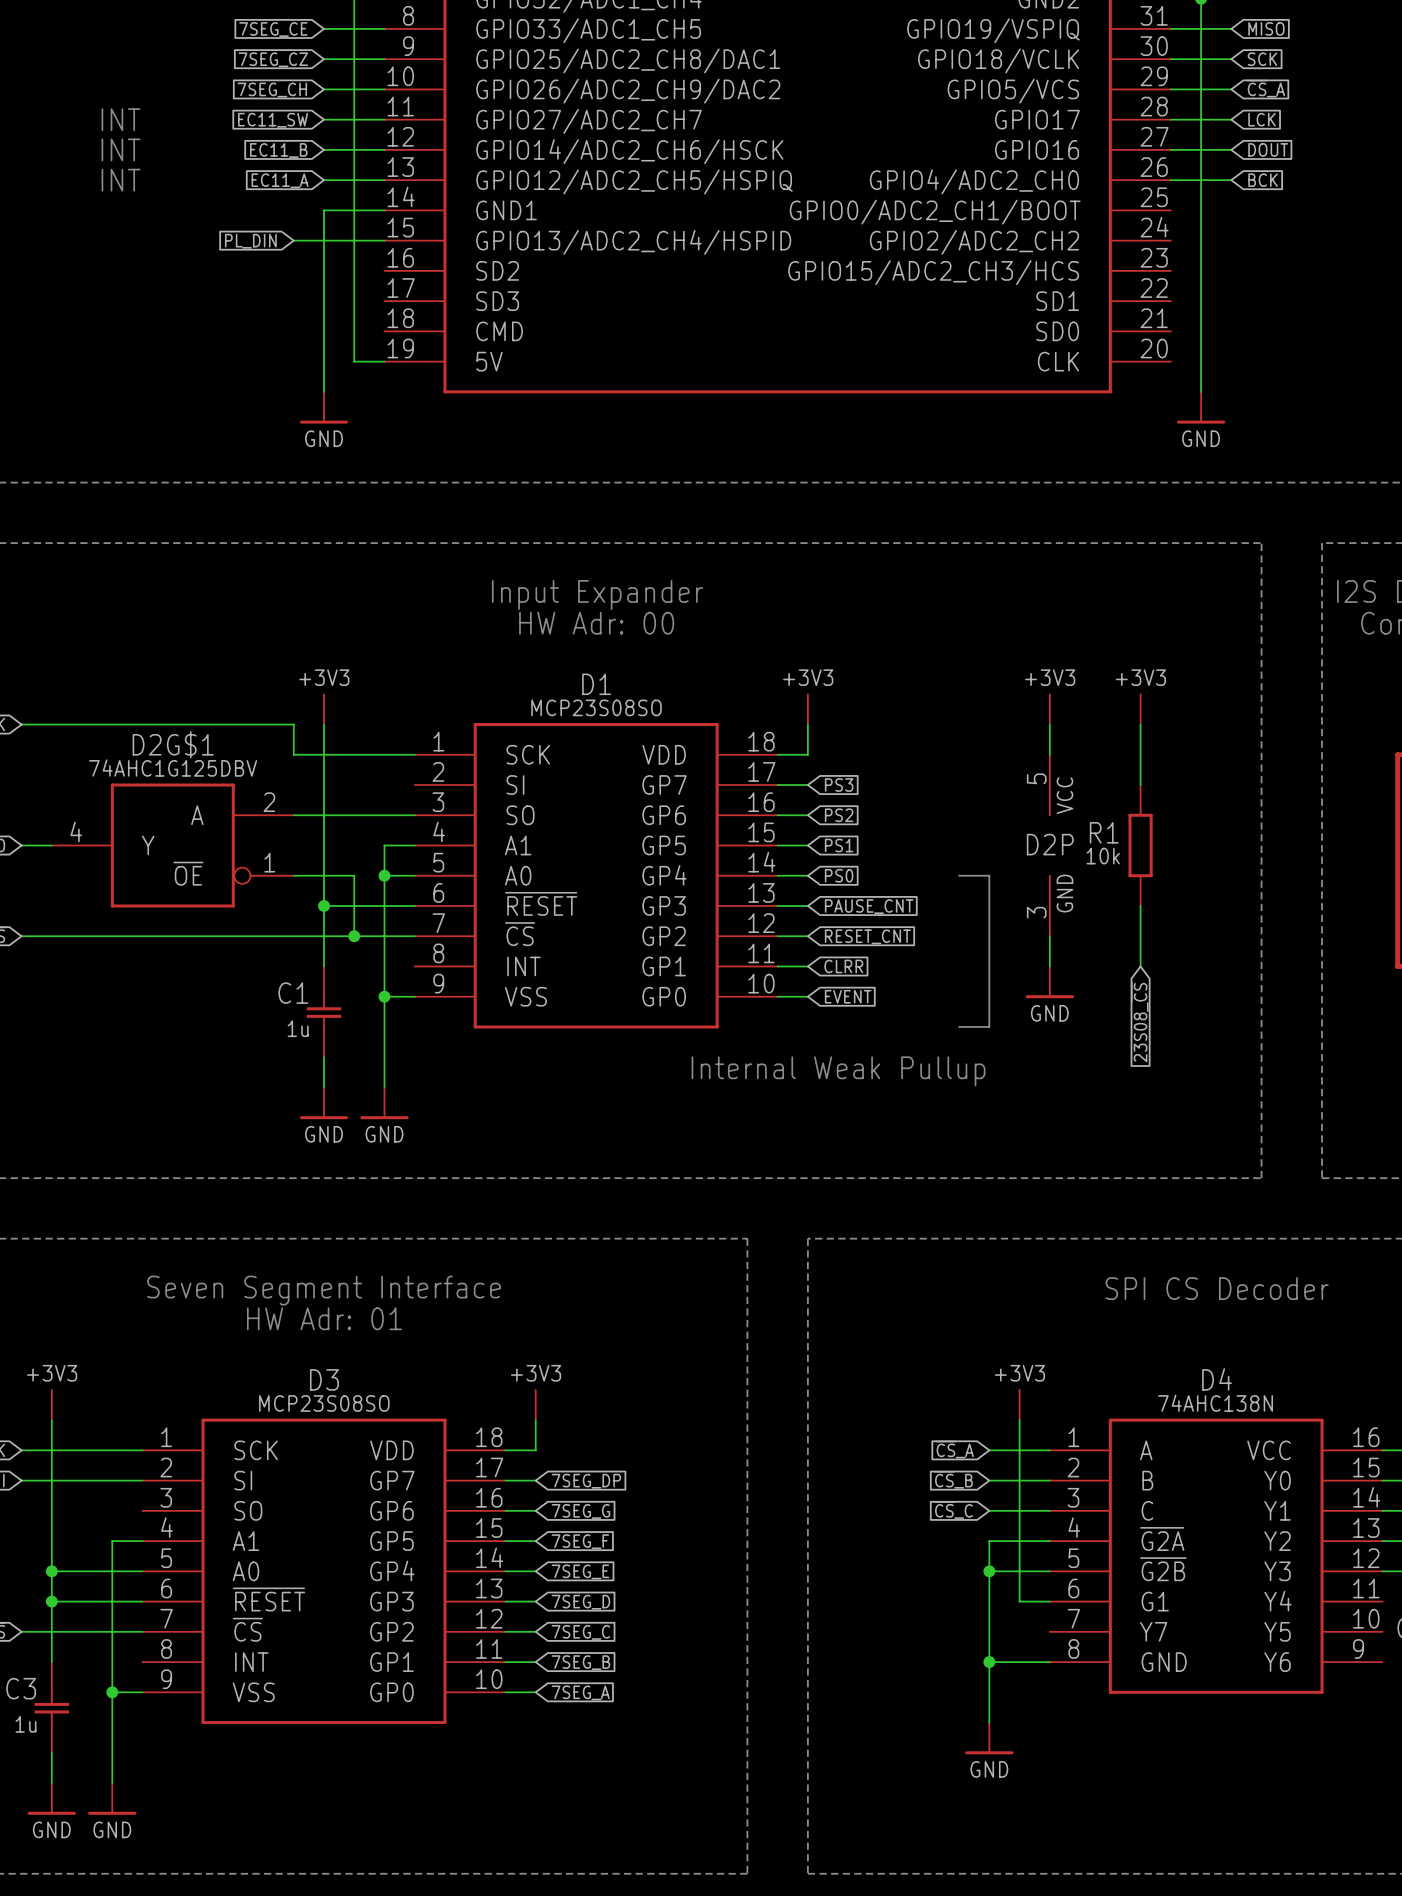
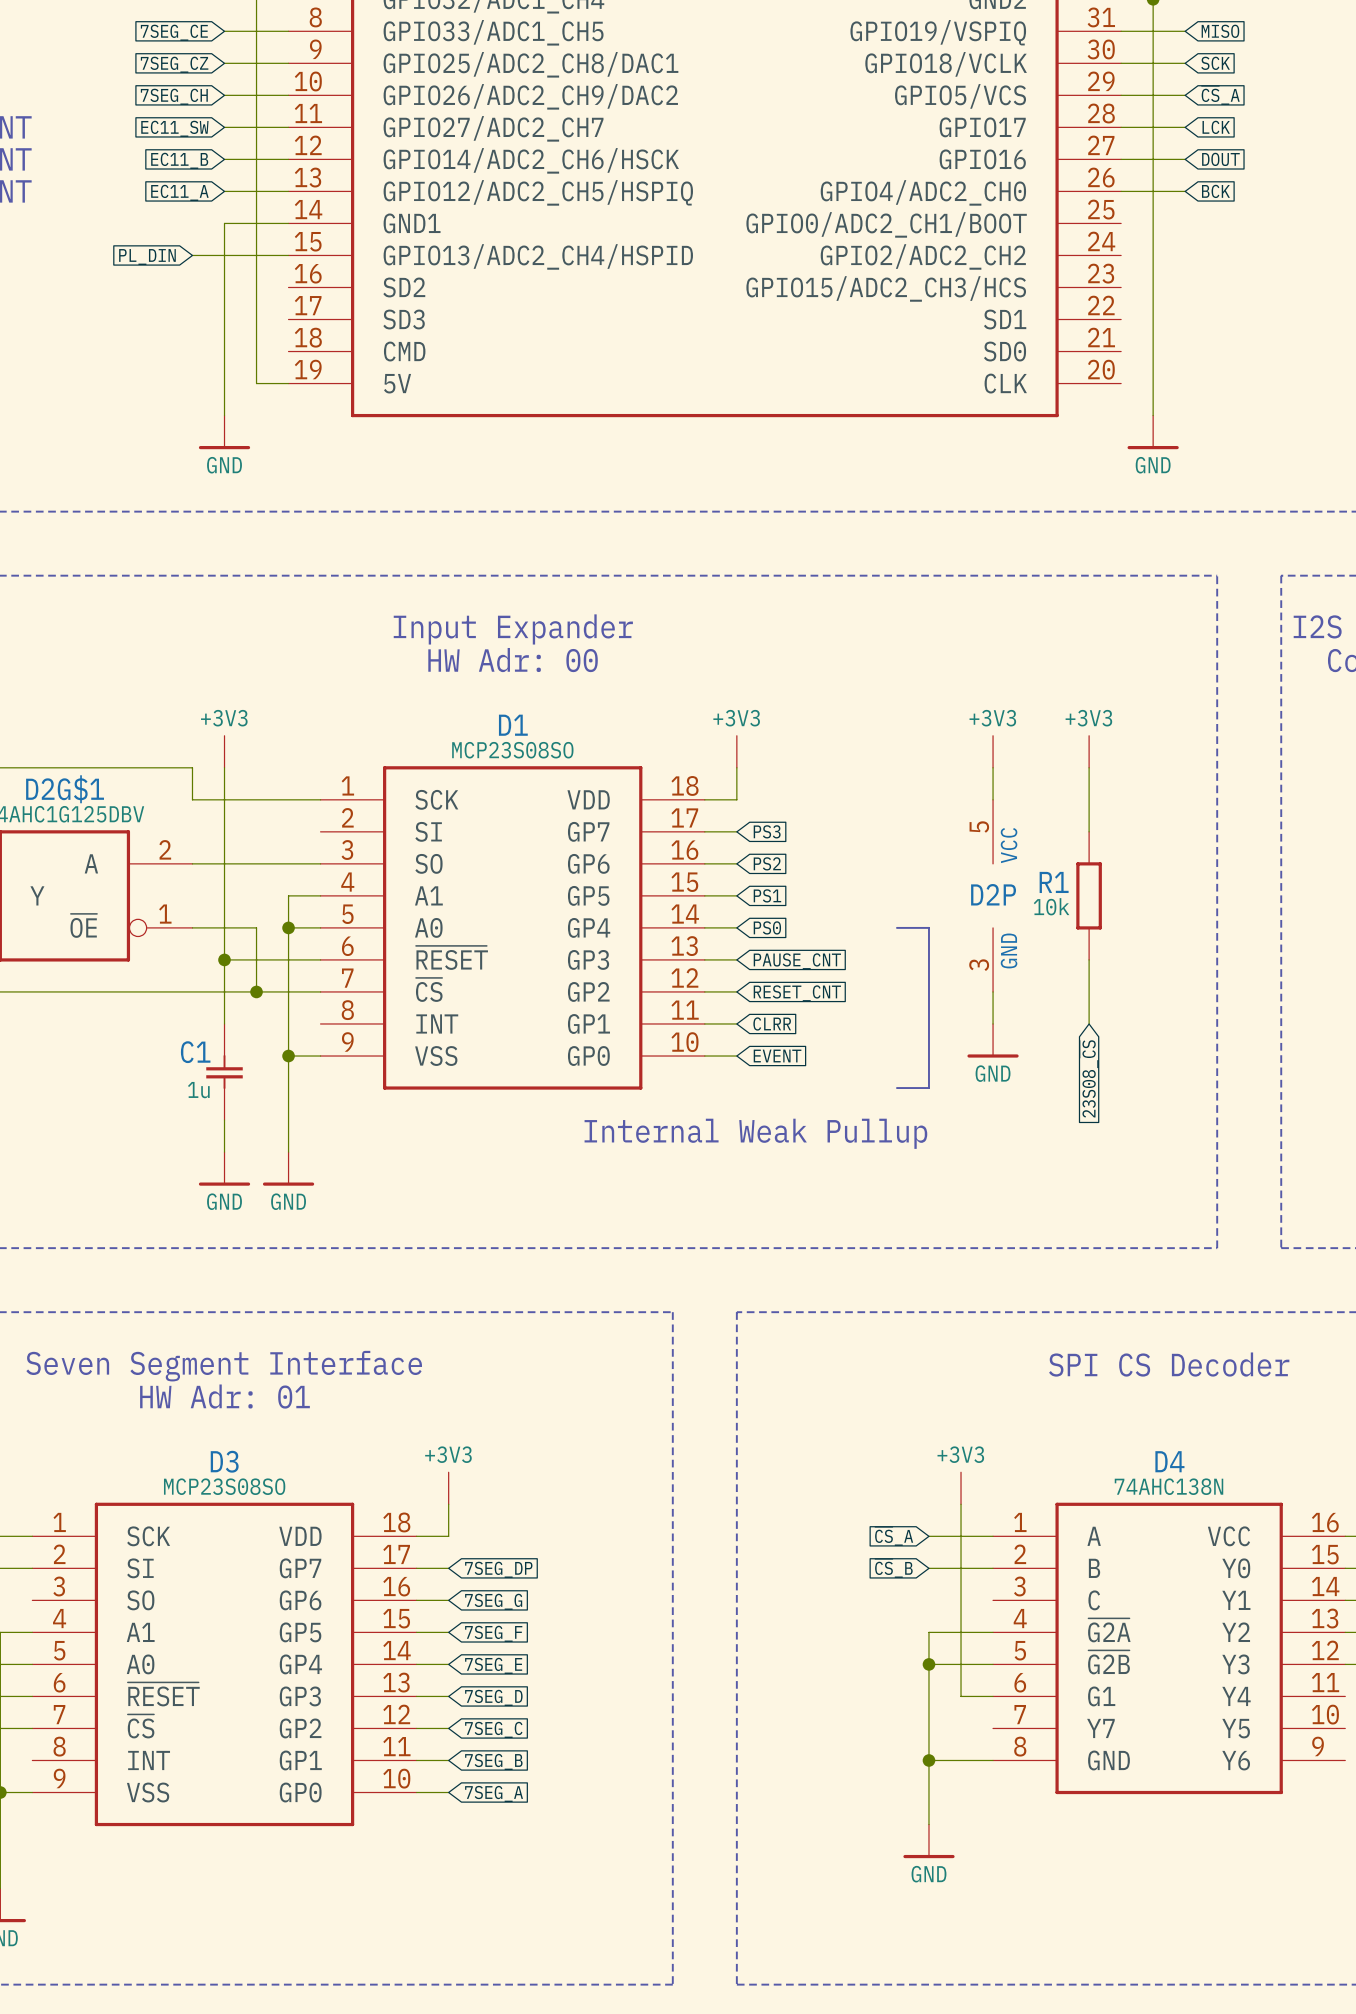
global label: ~{CS}_C (953, 1510) -> none
wire: (989, 1510) (1049, 1510) -> none

